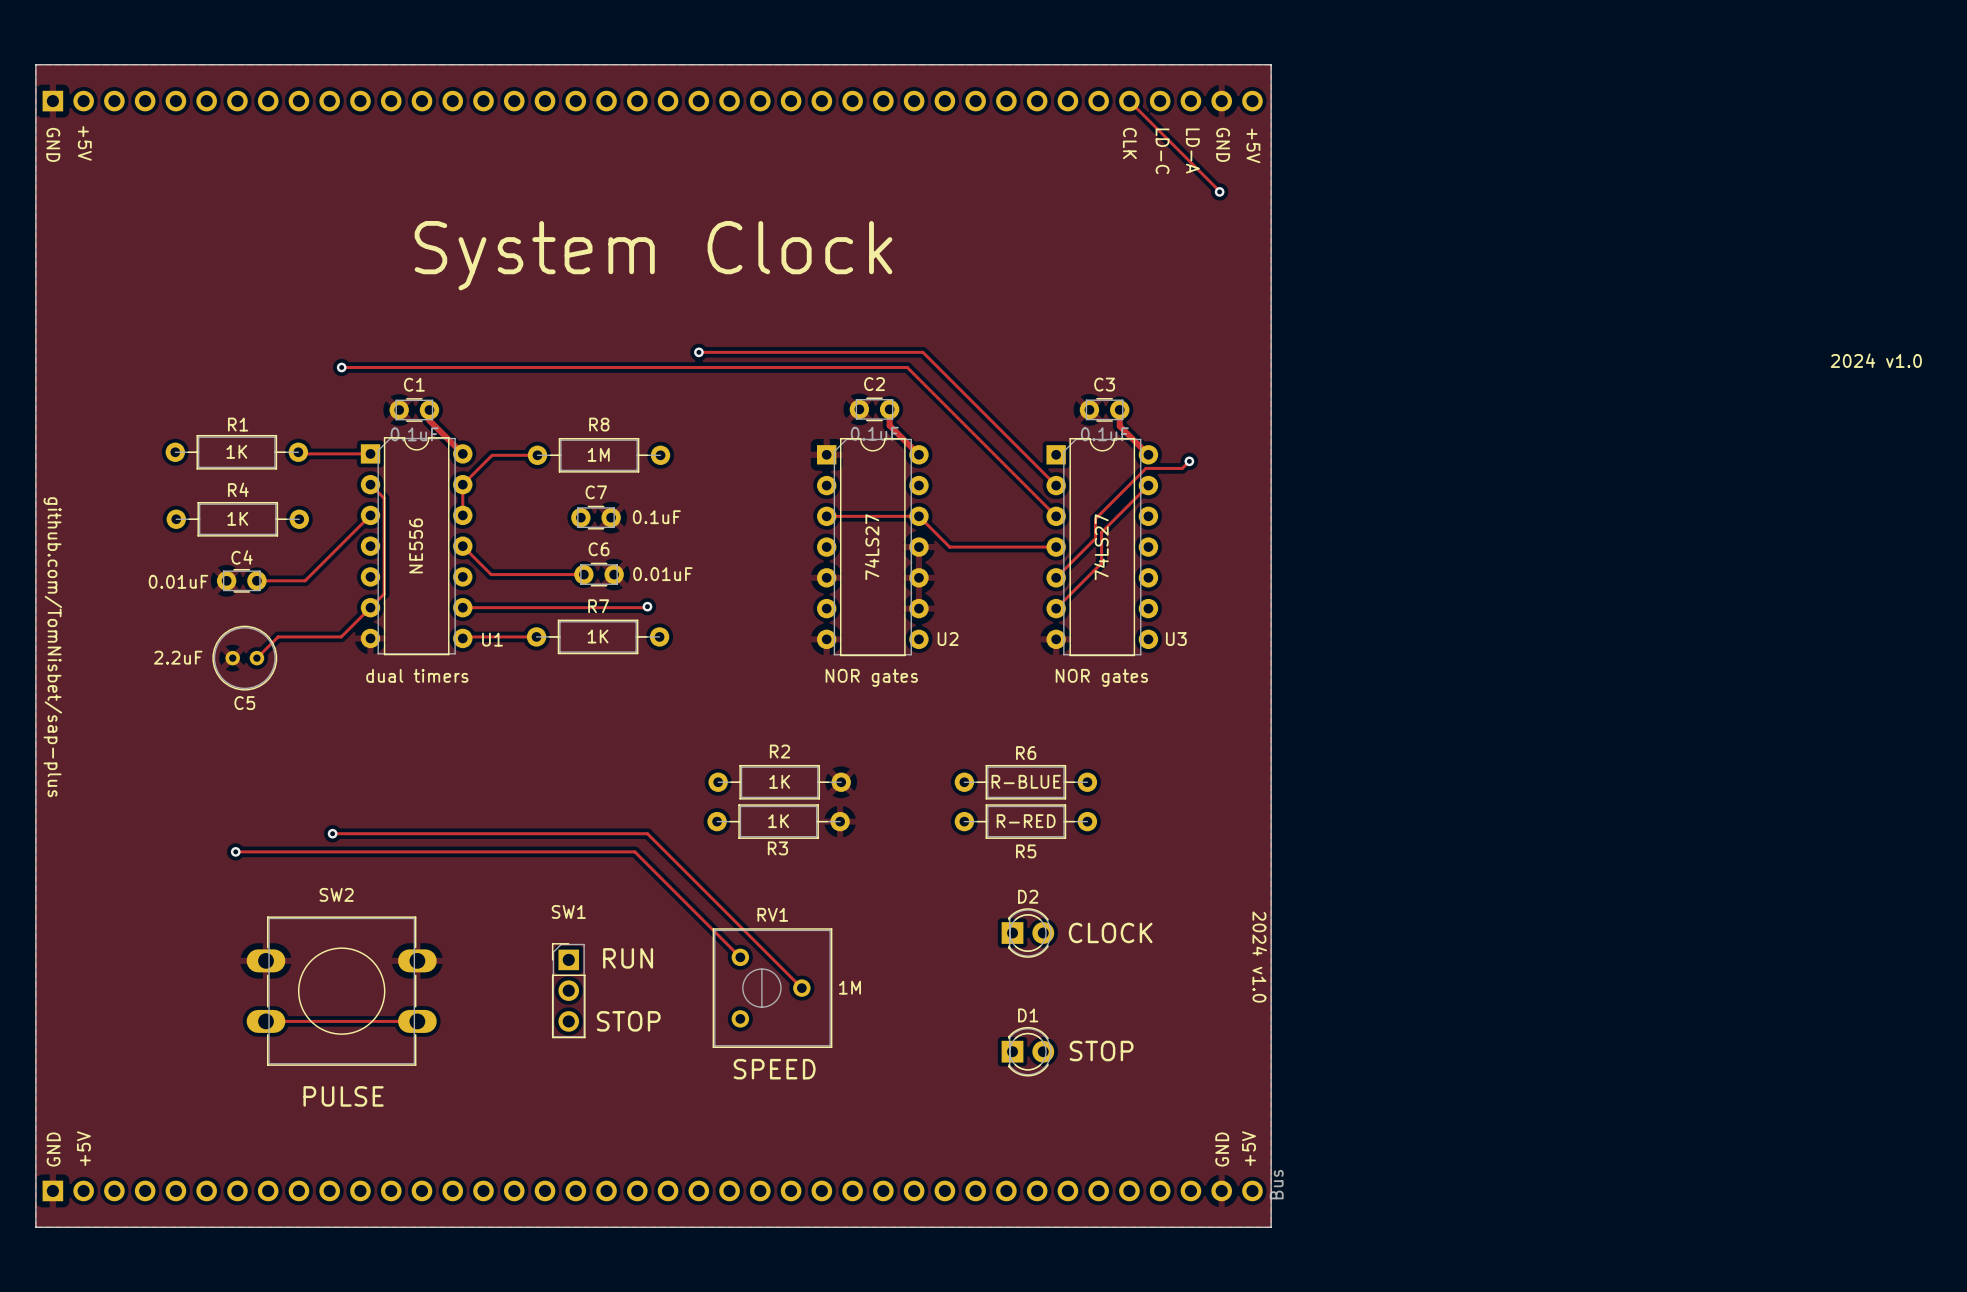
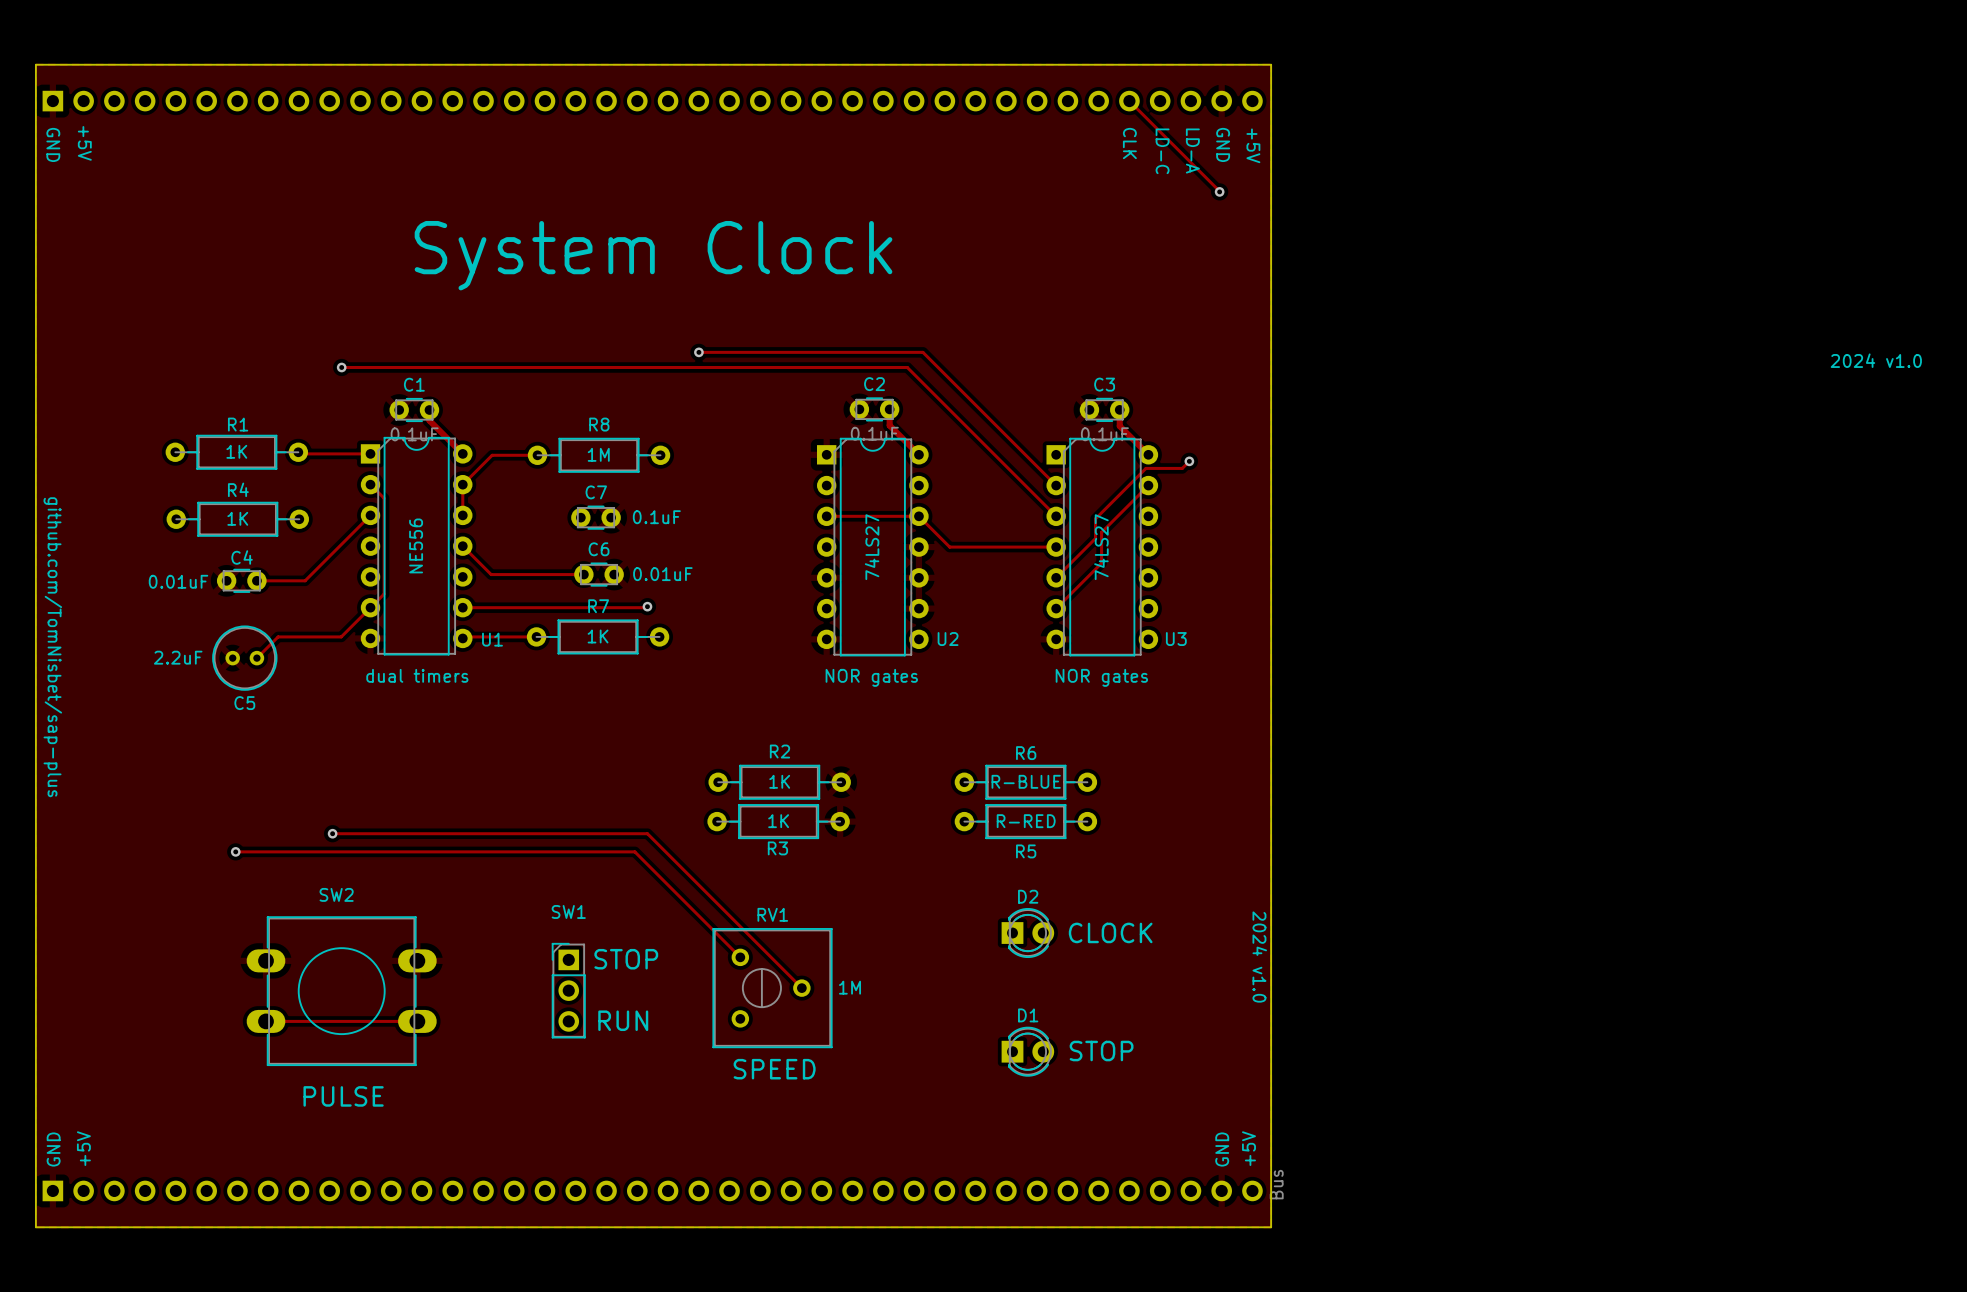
SW1 text: RUN (628, 958) -> STOP (626, 959)
SW1 value: STOP (628, 1021) -> RUN (623, 1020)

